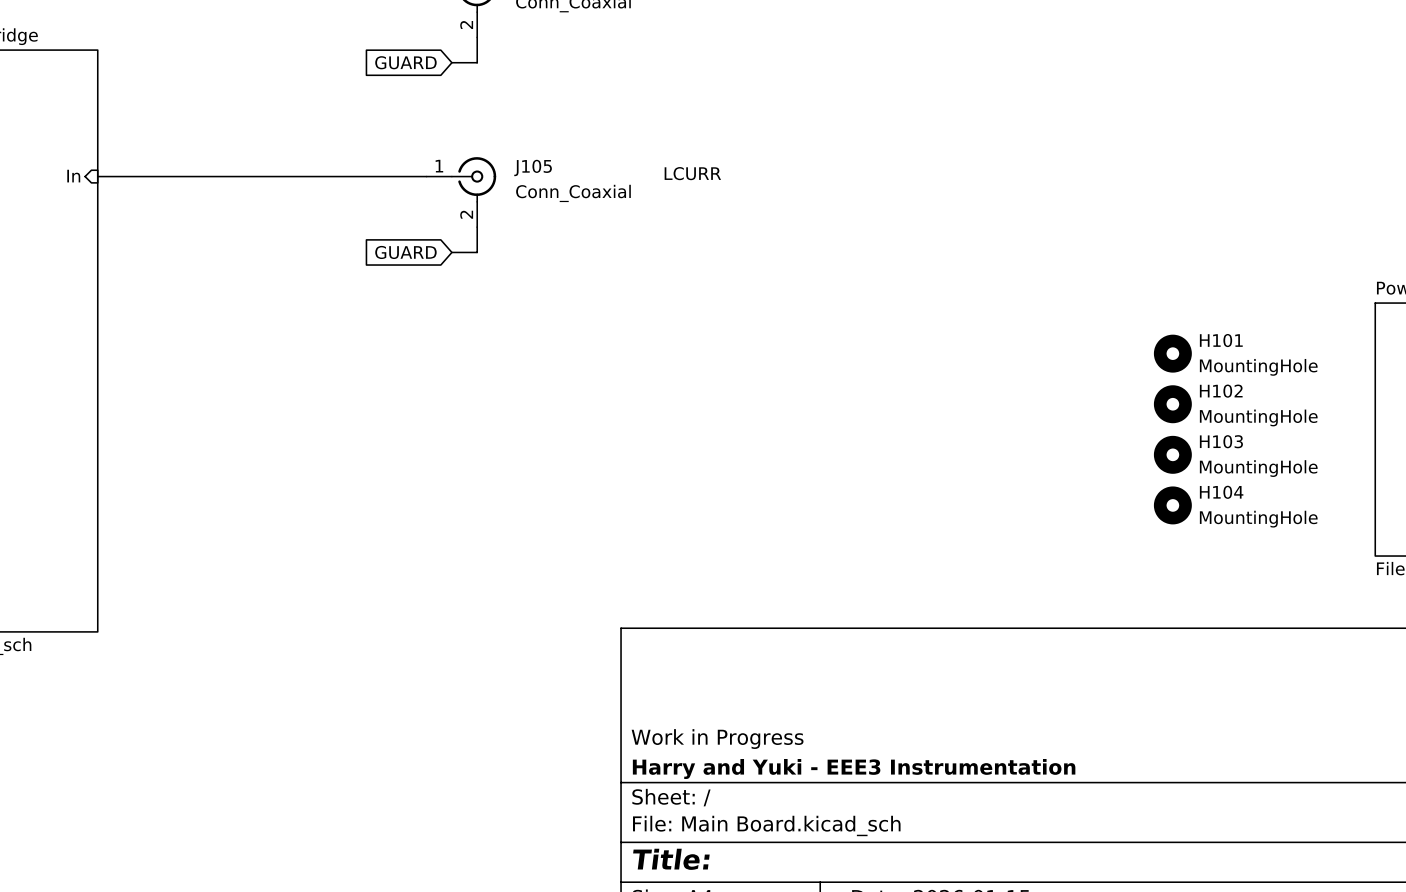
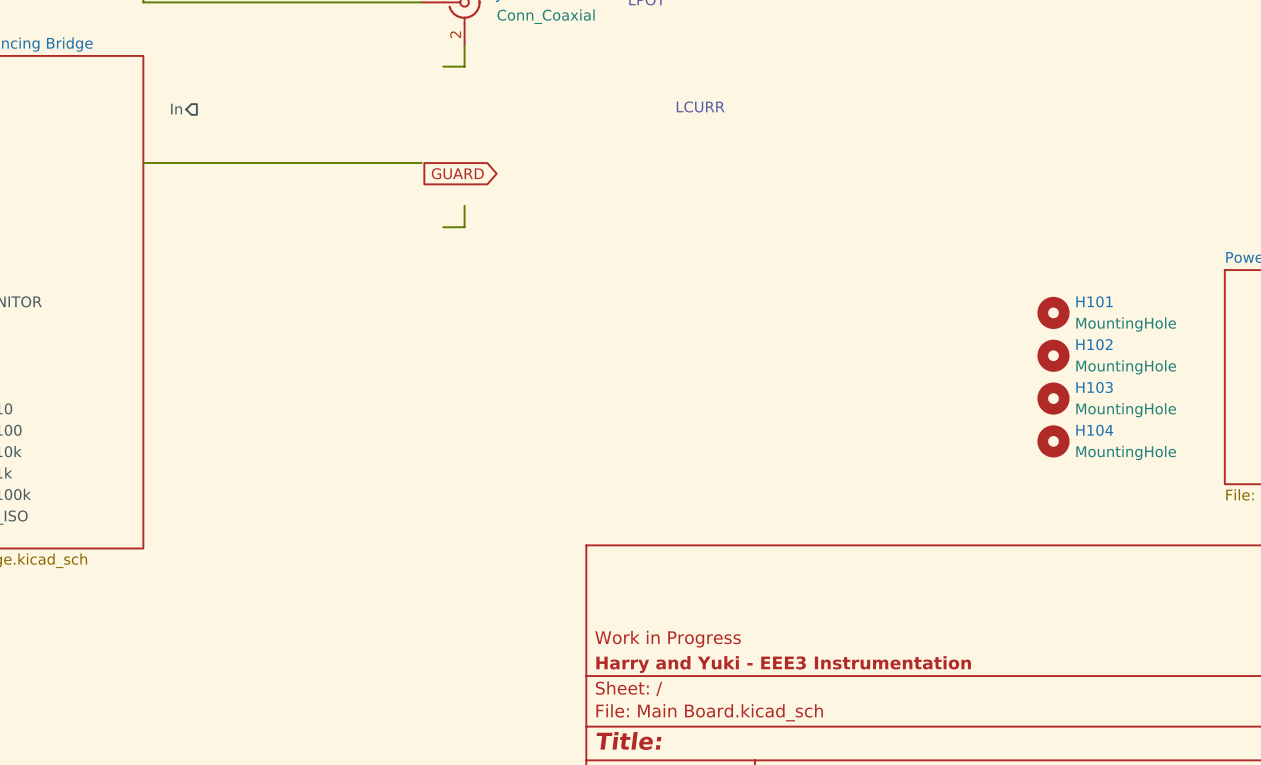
global label: GUARD (405, 62) -> none
text position: LCURR (692, 173) -> LCURR (700, 106)
sheet pin position: In (73, 176) -> In (176, 109)
global label: none -> GUARD (457, 173)
J105: Conn_Coaxial (461, 192) -> none
global label: GUARD (405, 252) -> none

